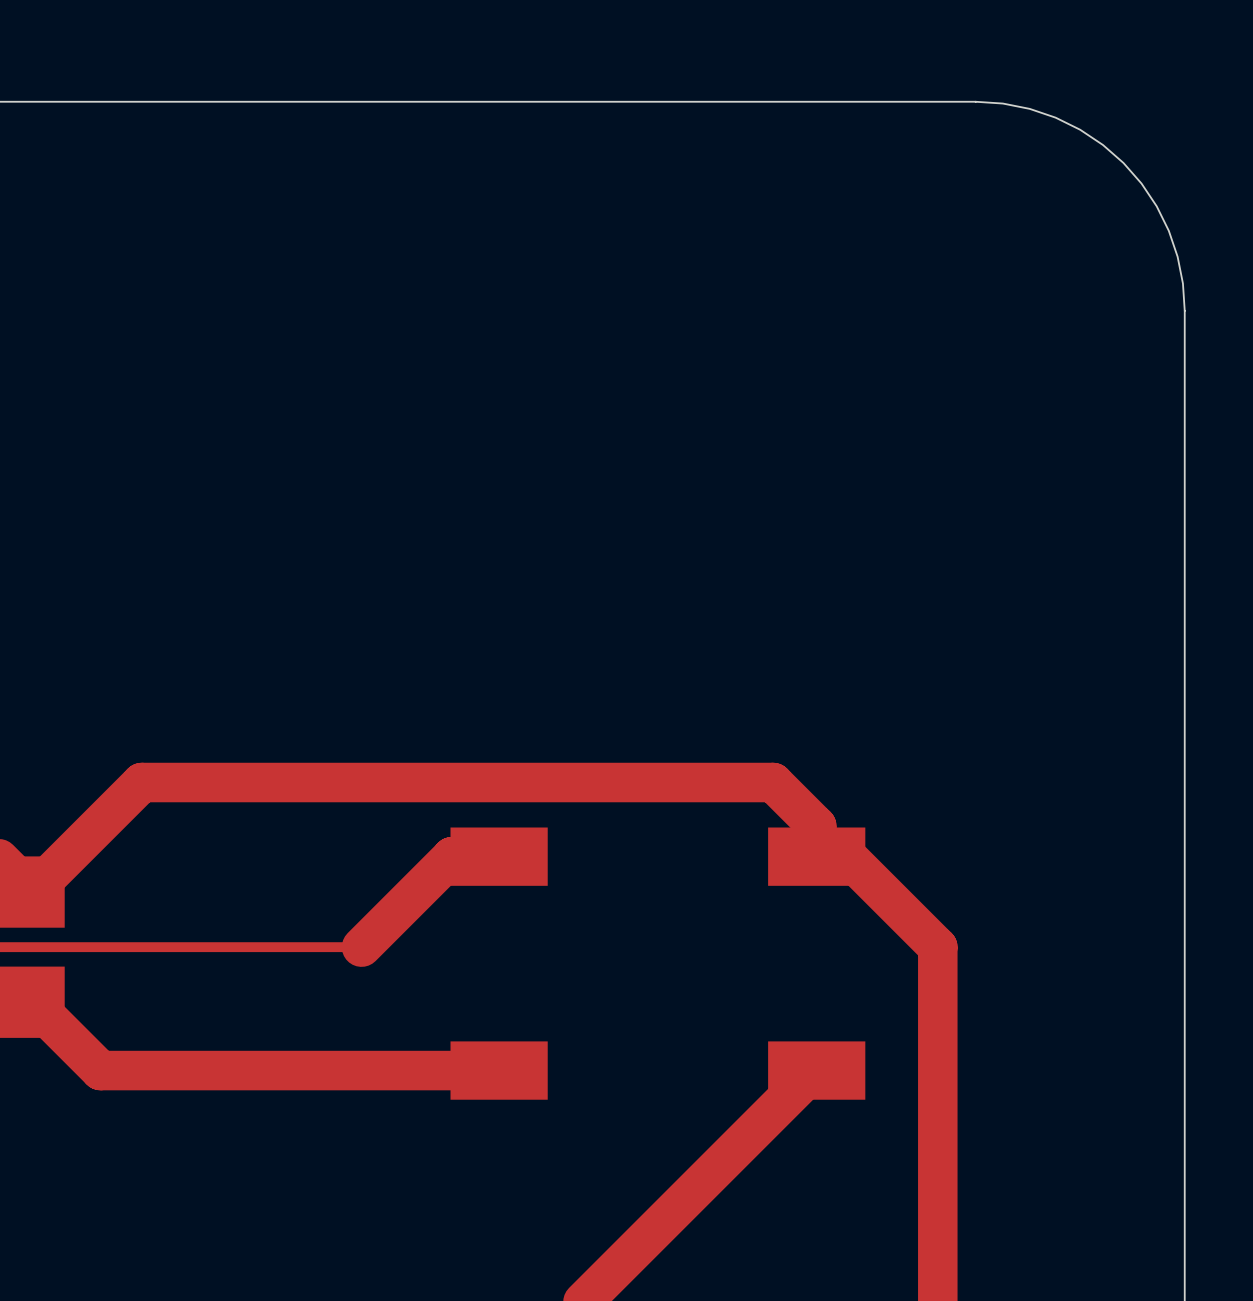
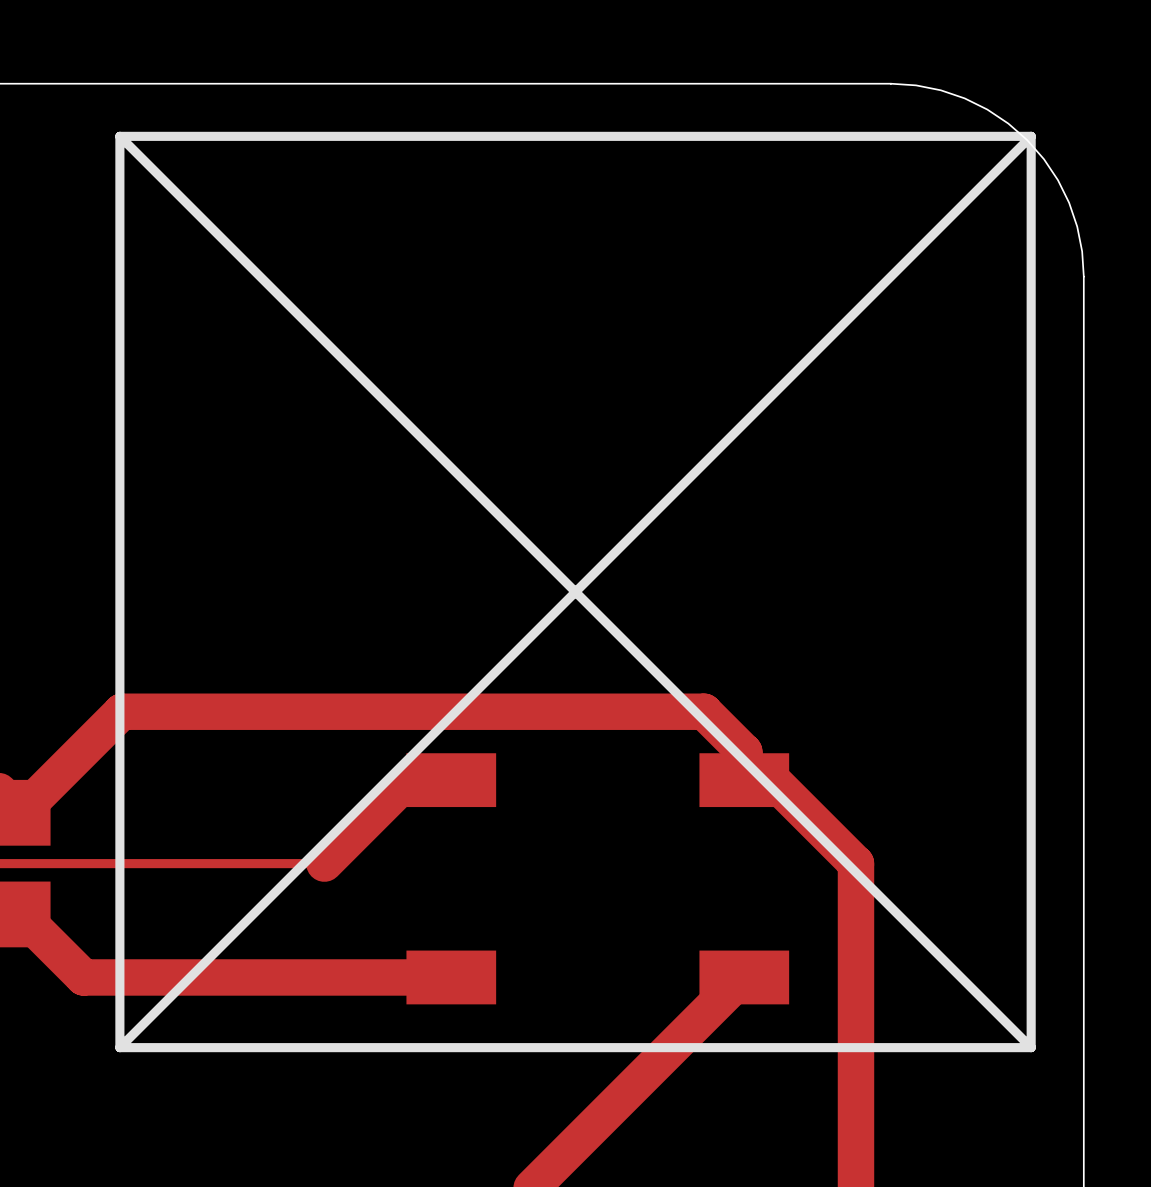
line: none -> (119, 136) (119, 1047)
line: none -> (119, 136) (1031, 1047)
line: none -> (1031, 136) (1031, 1047)
line: none -> (1031, 136) (119, 136)
line: none -> (1031, 136) (119, 1047)
line: none -> (1031, 1047) (119, 1047)

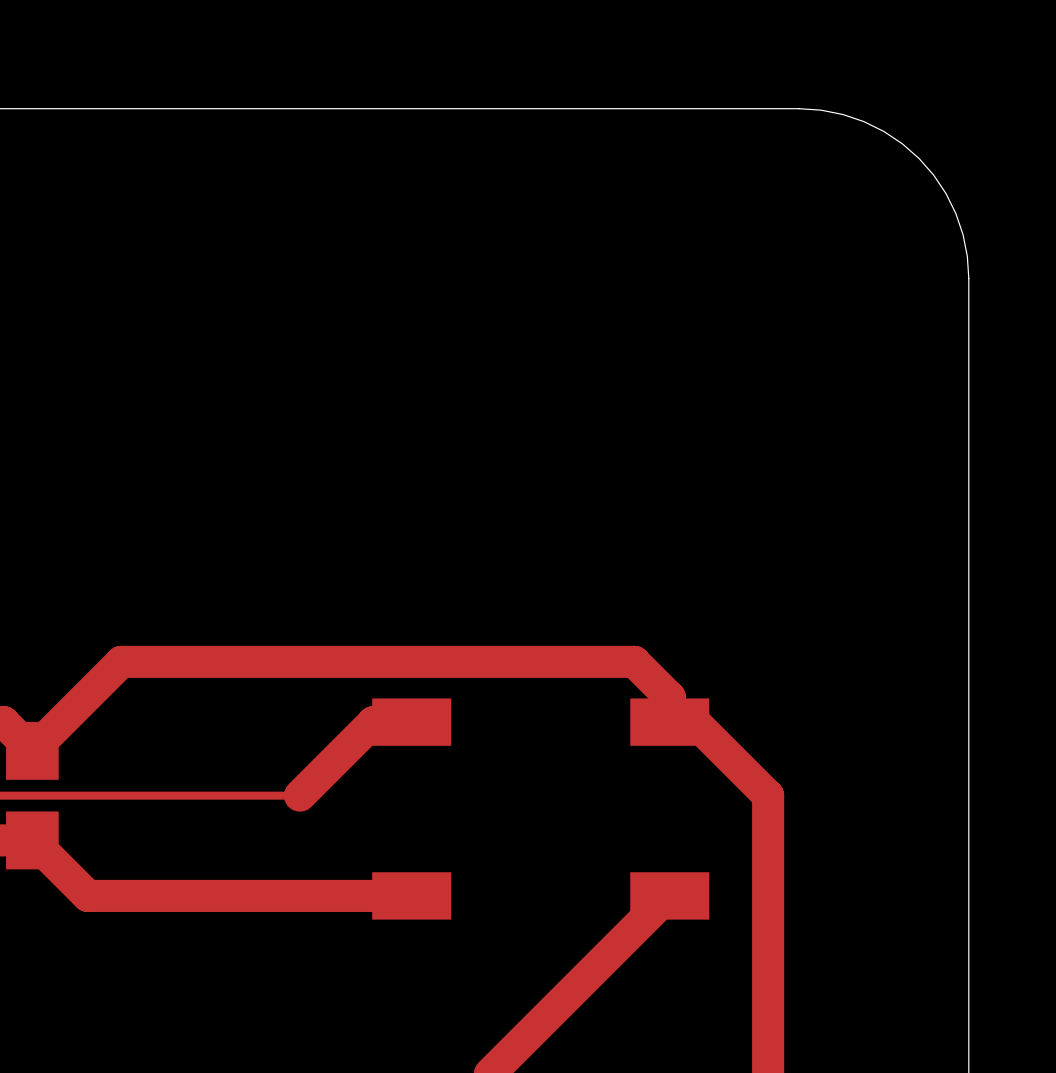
line: (119, 136) (119, 1047) -> none
line: (119, 136) (1031, 1047) -> none
line: (1031, 136) (1031, 1047) -> none
line: (1031, 136) (119, 136) -> none
line: (1031, 136) (119, 1047) -> none
line: (1031, 1047) (119, 1047) -> none

